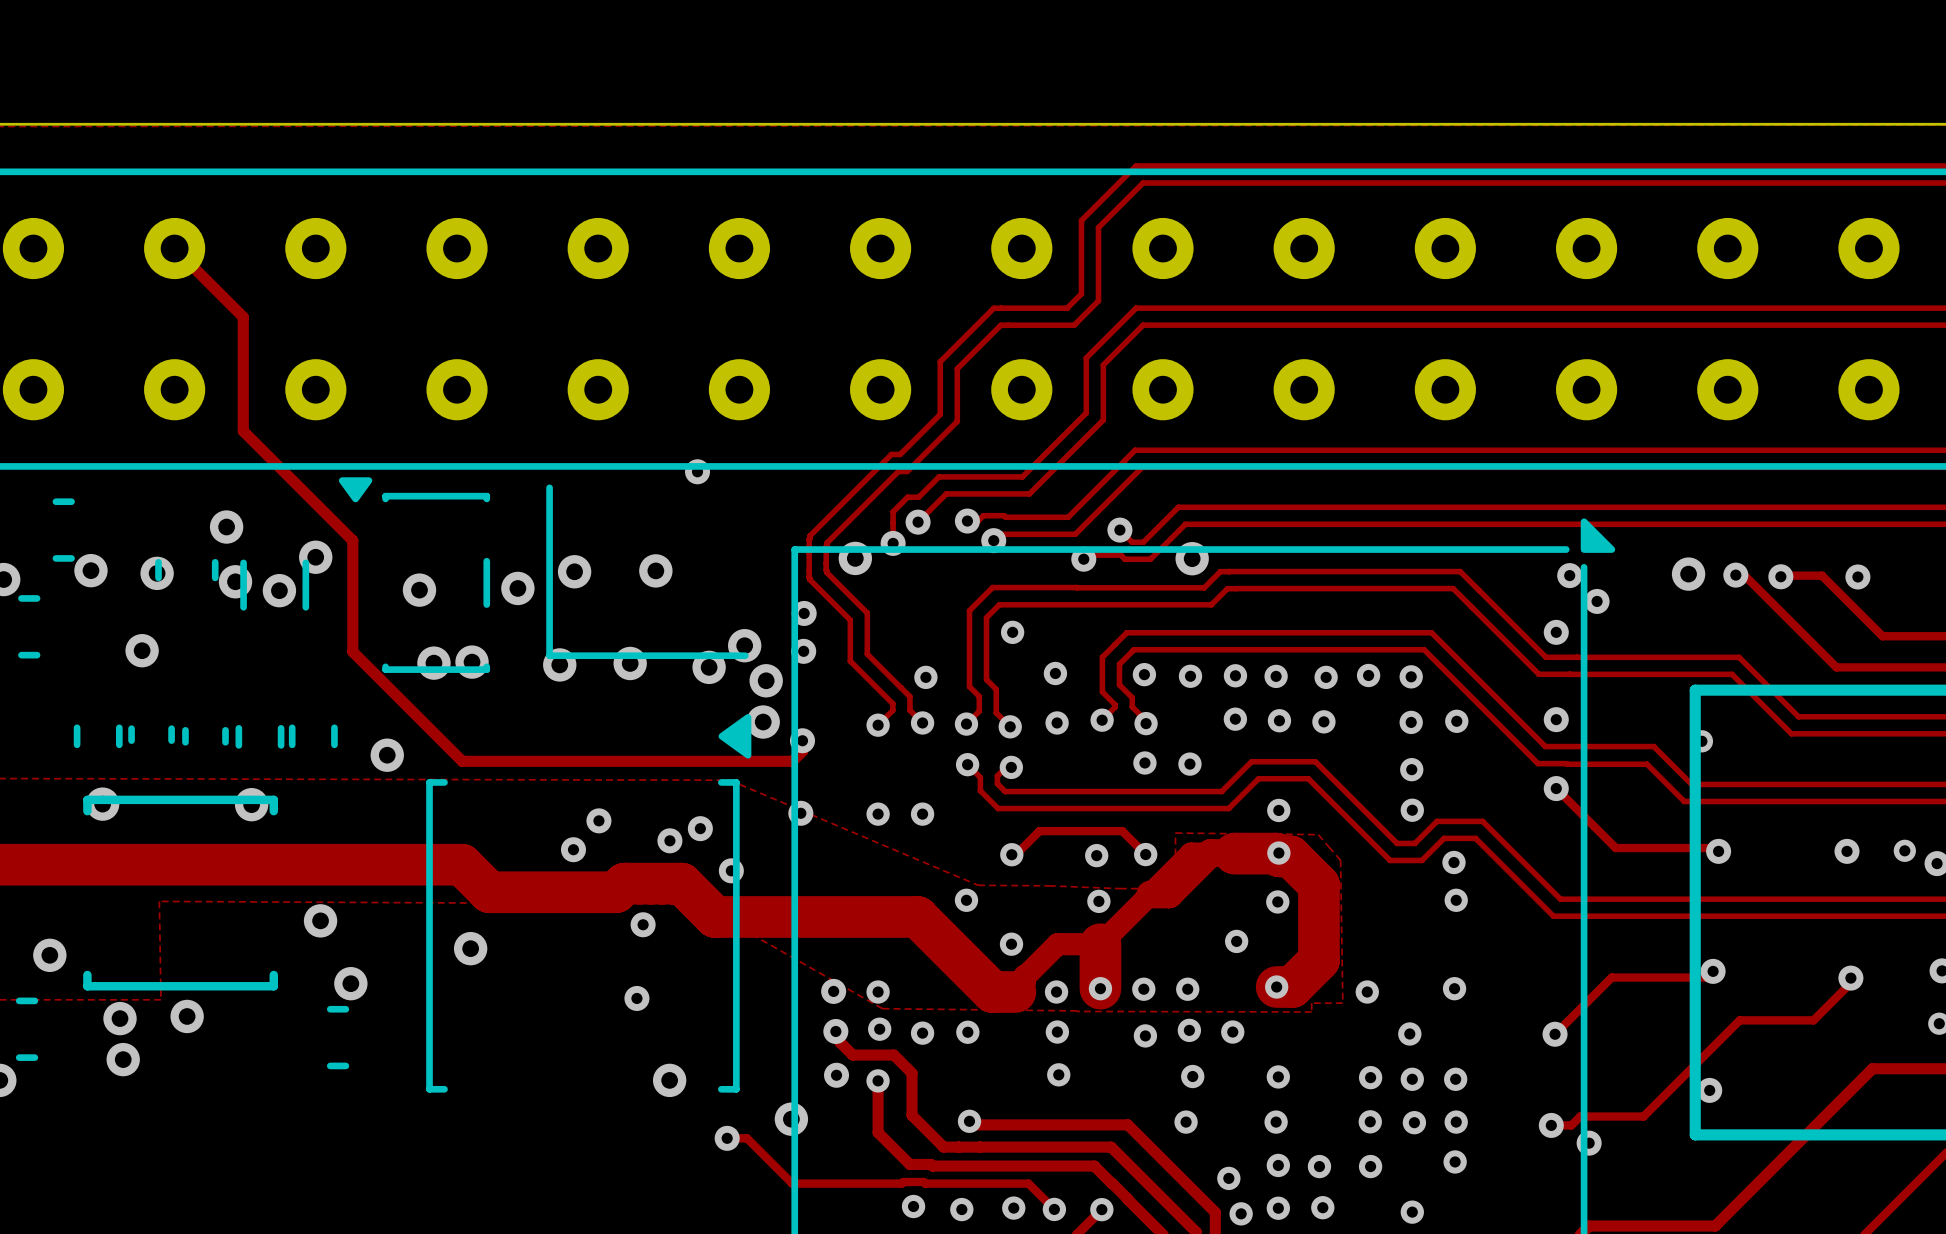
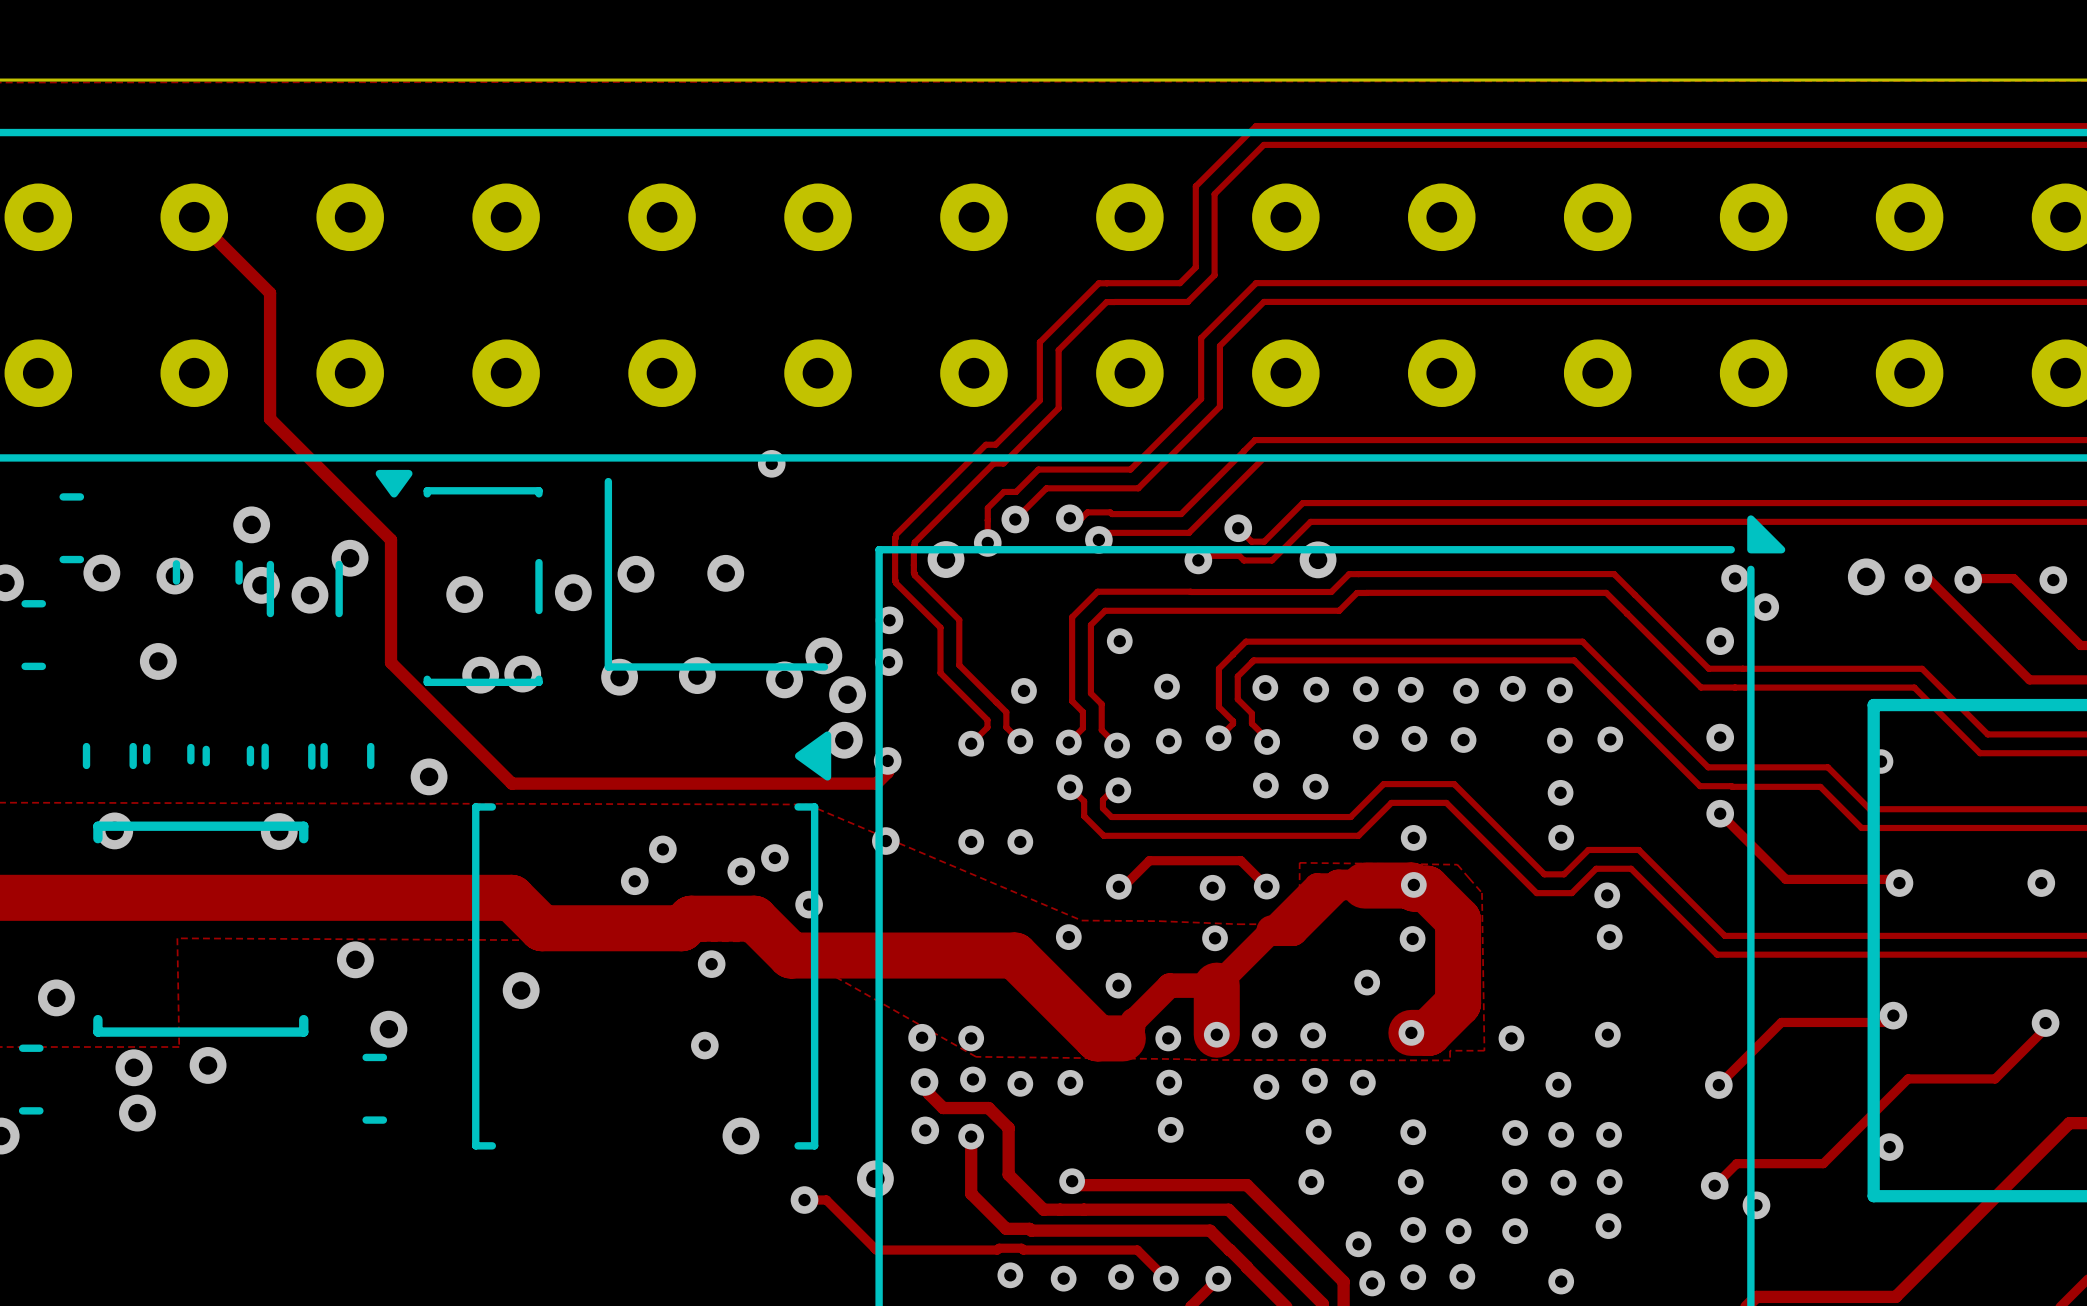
track: (1813, 1020) (1739, 1020) (1643, 1116) (1580, 1116) (1571, 1125) (1551, 1125) -> (2004, 1069) (1995, 1078) (1908, 1078) (1823, 1163) (1736, 1163) (1714, 1185)

